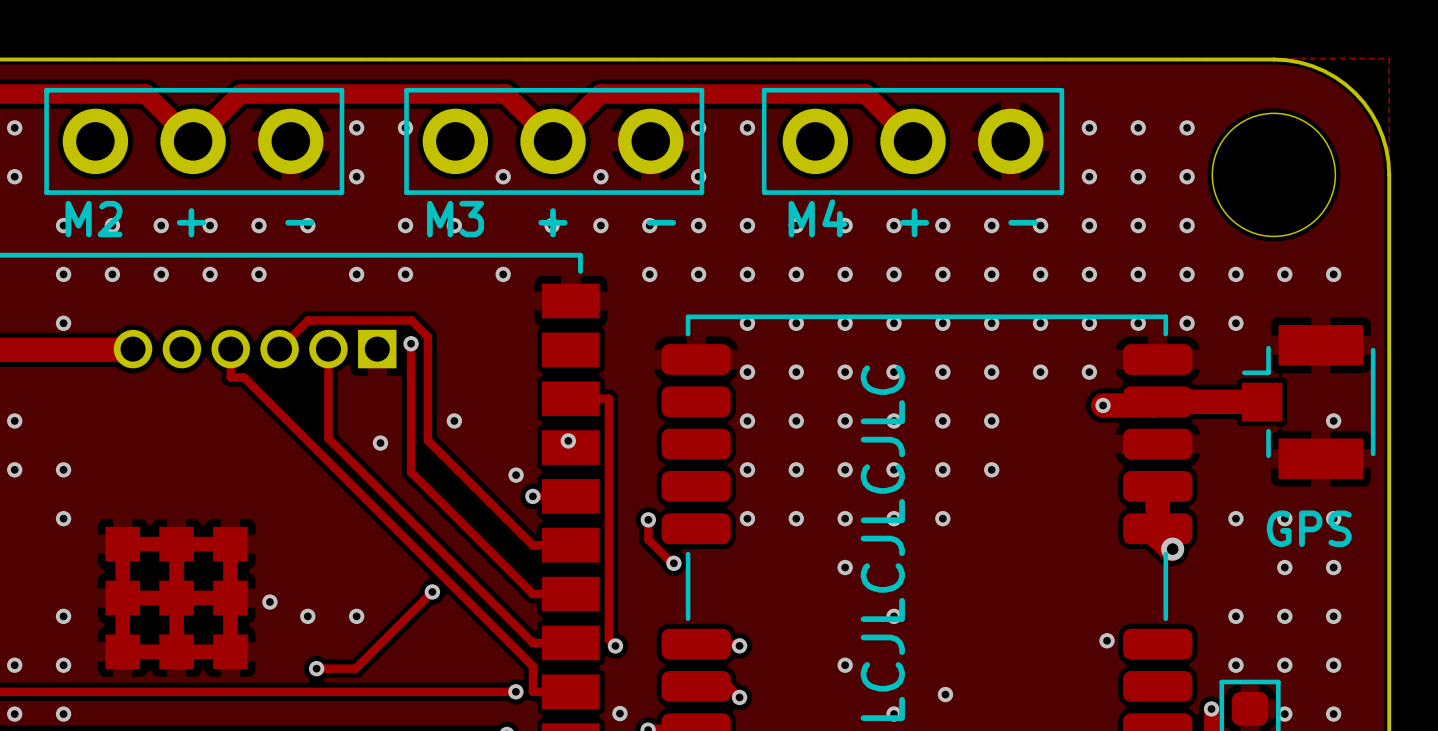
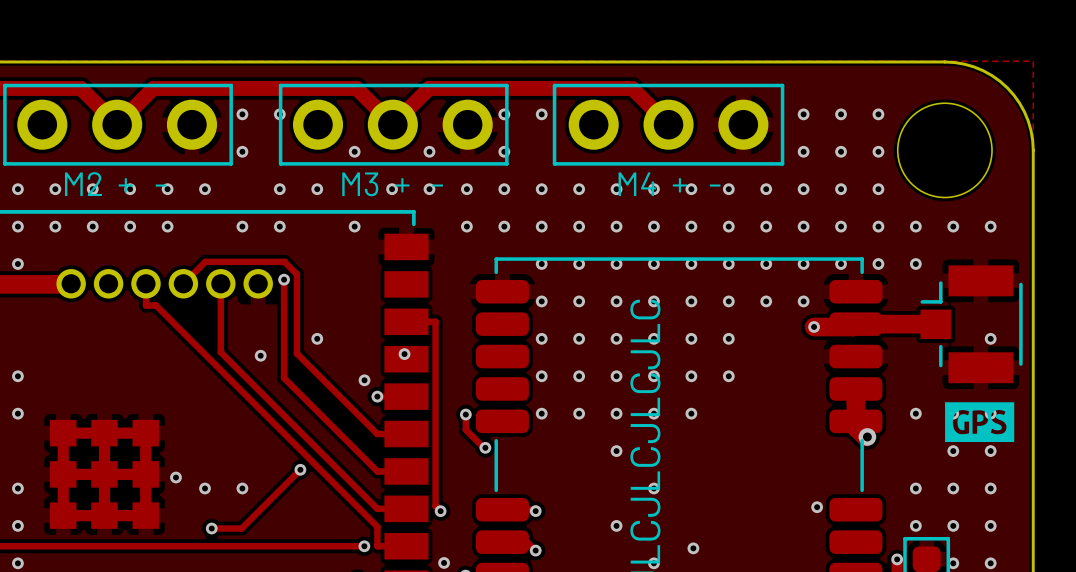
part footprint: [113, 329, 397, 369] -> [56, 269, 273, 299]
drawing: none -> [945, 402, 1015, 443]
text: GPS (1309, 528) -> none

